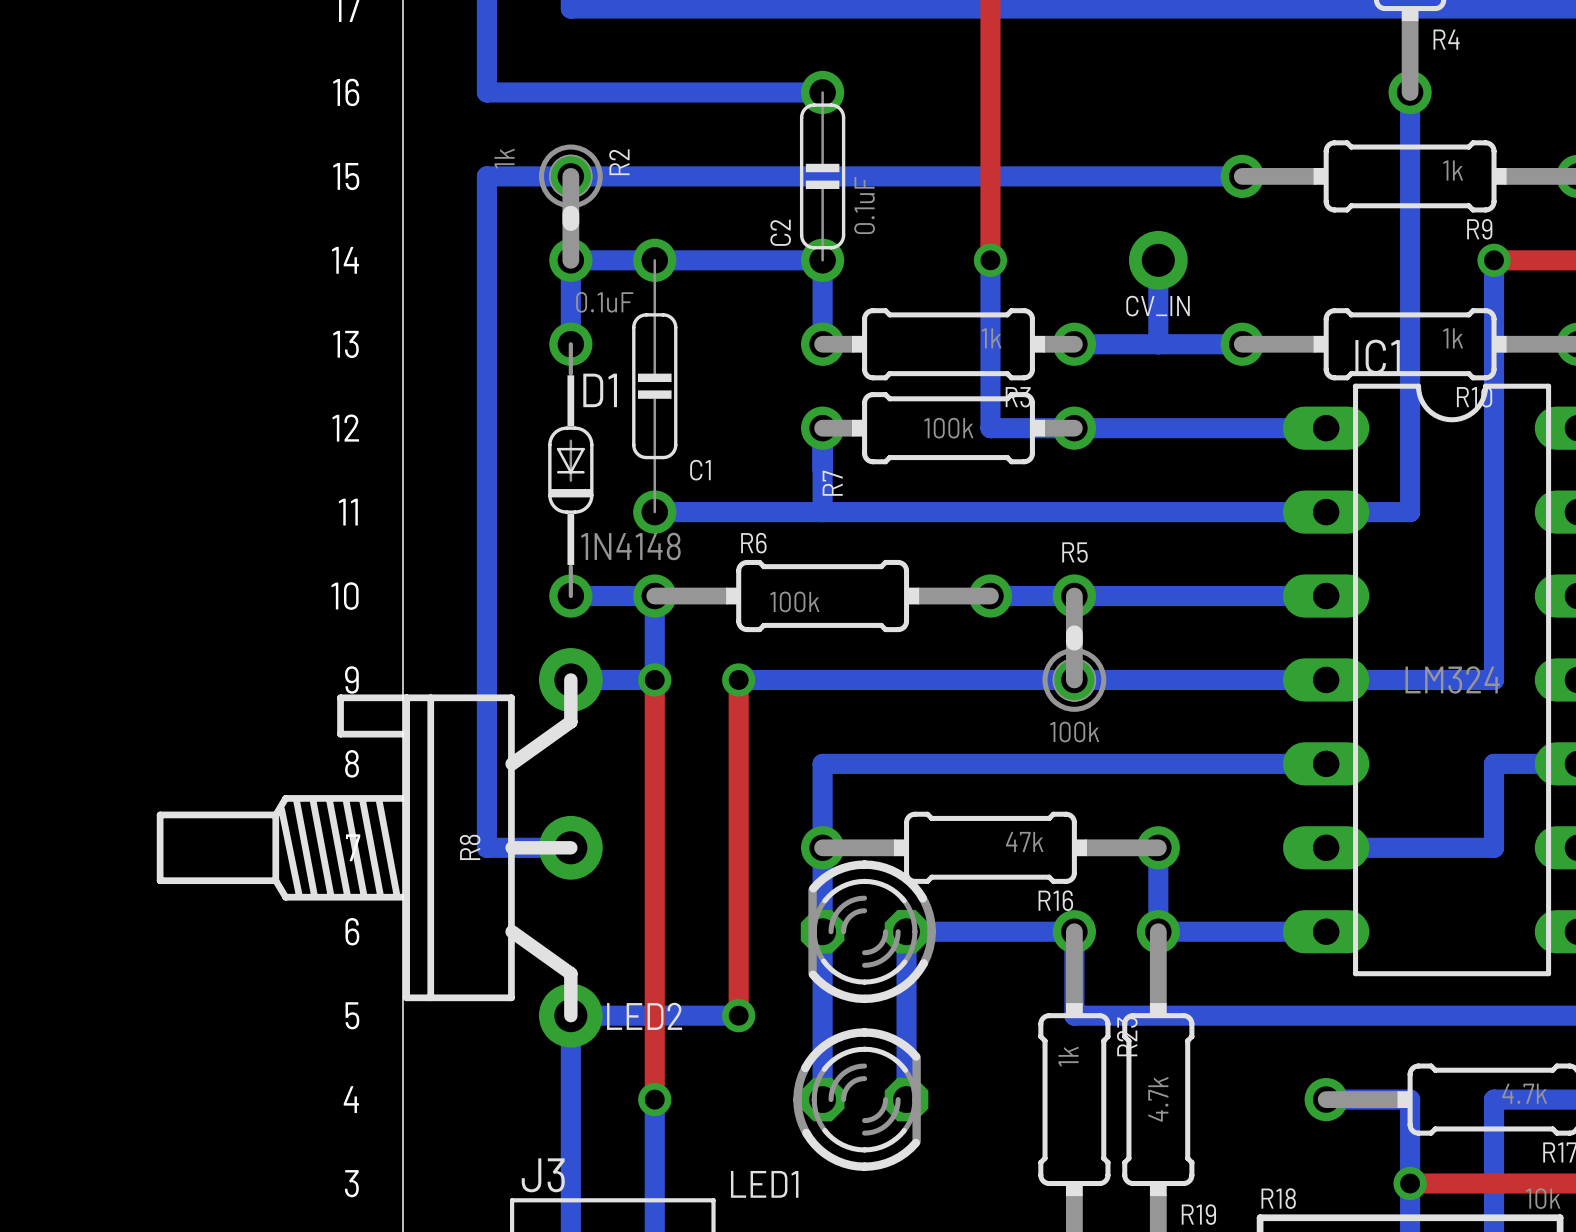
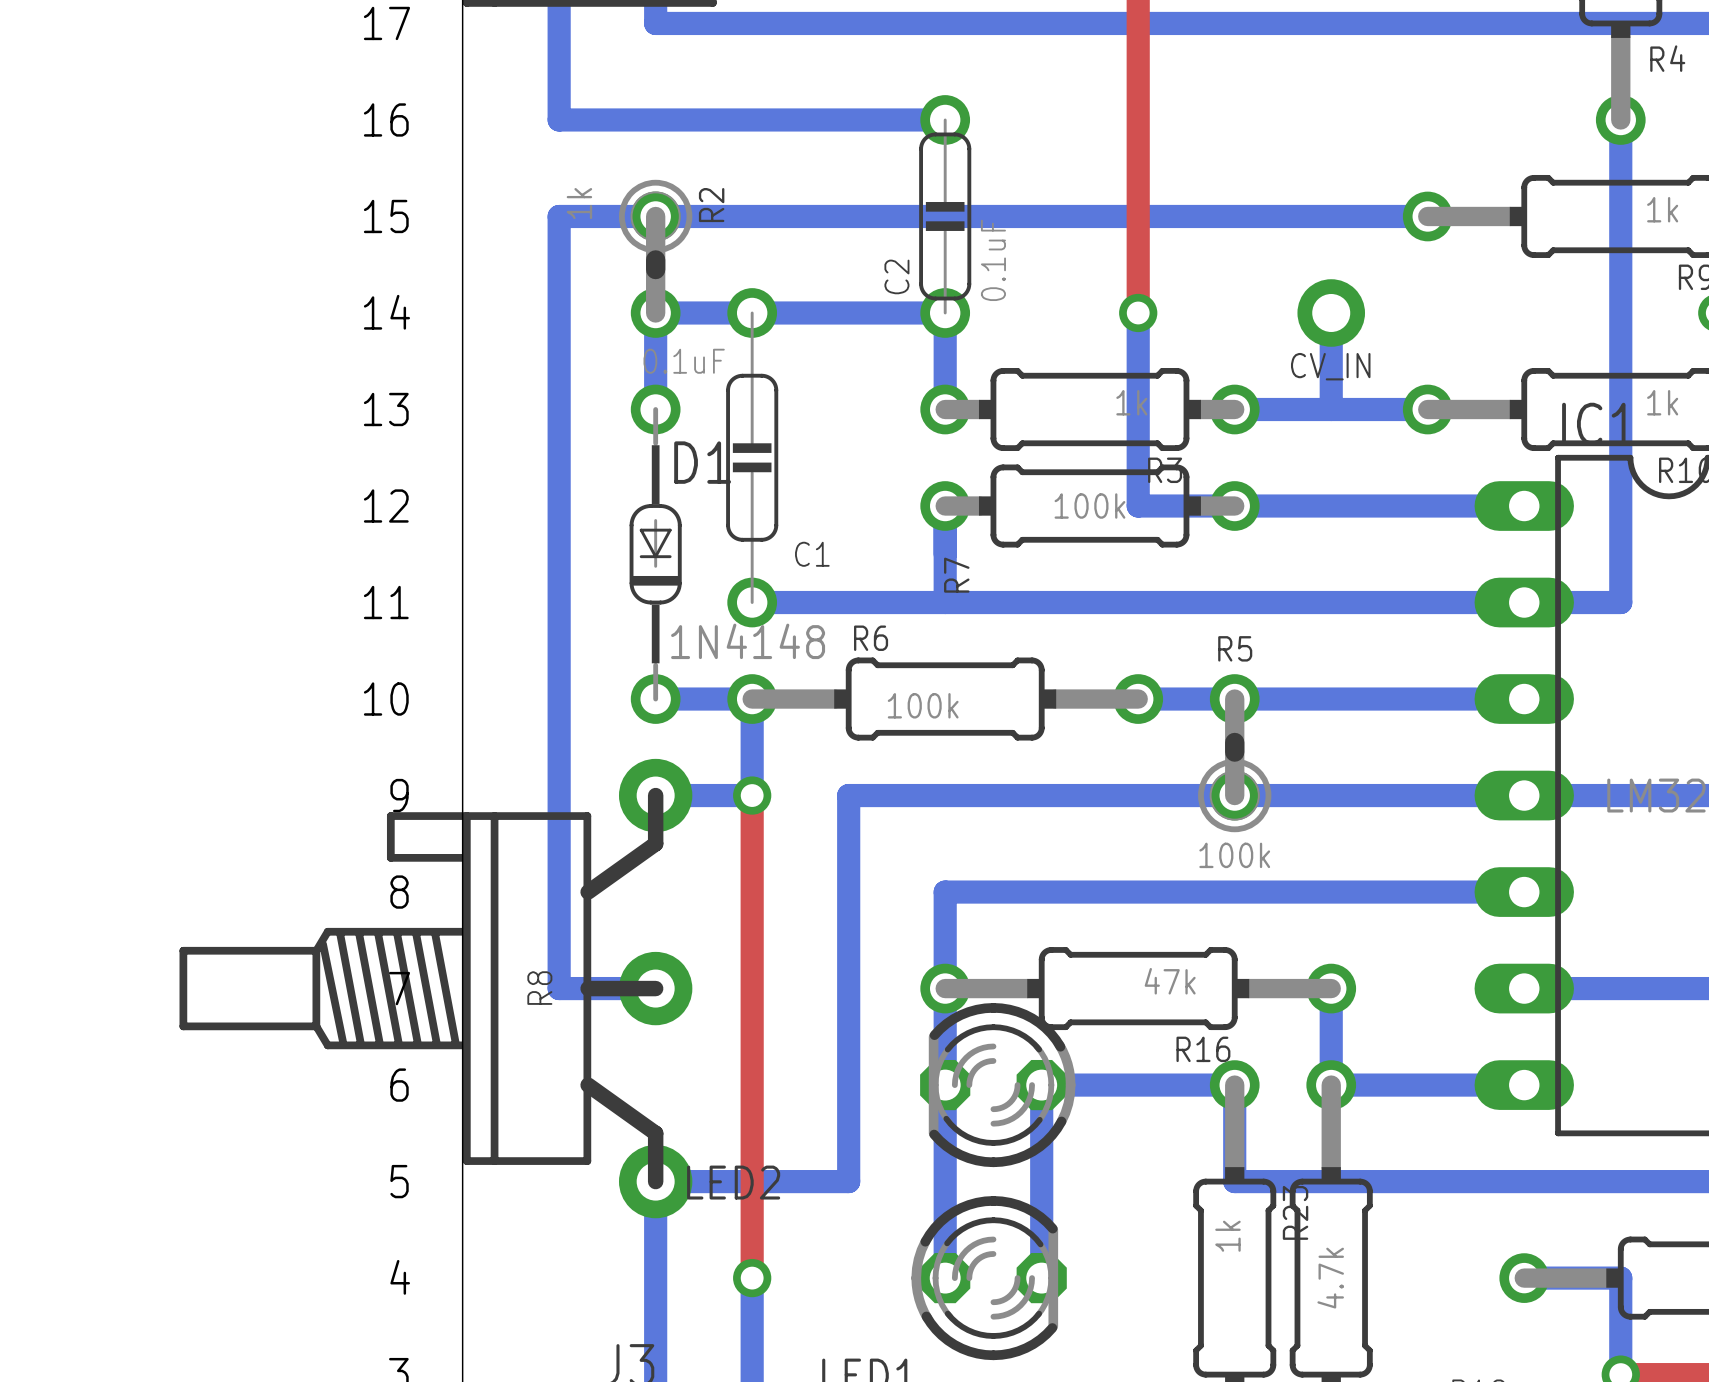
bottom track: none -> (848, 795) (848, 1181)
top track: (738, 679) (738, 1015) -> none
via: (738, 679) -> none
via: (738, 1015) -> none

